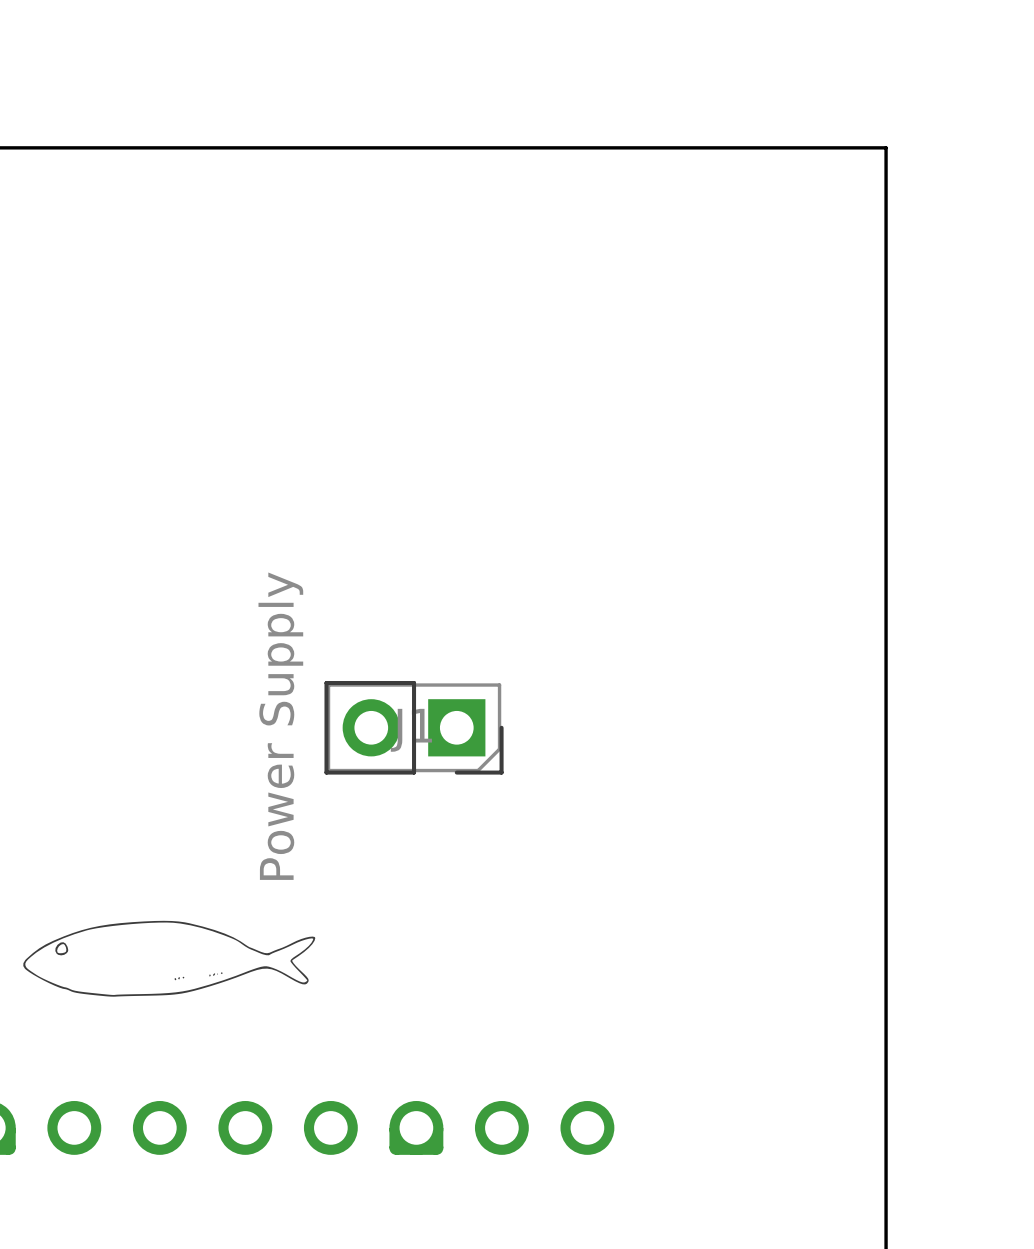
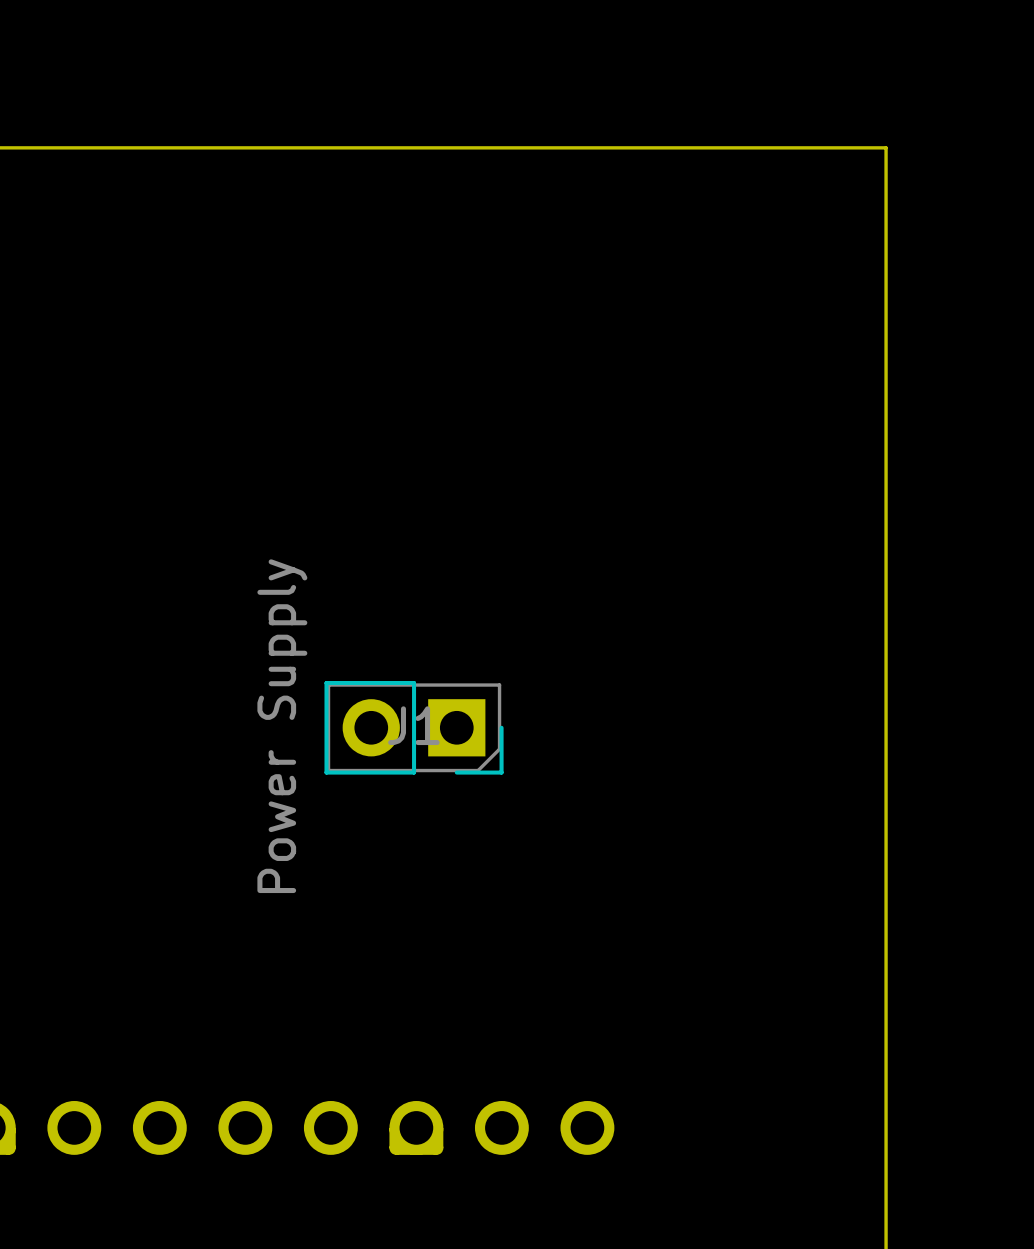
drawing: [23, 920, 316, 997] -> none

